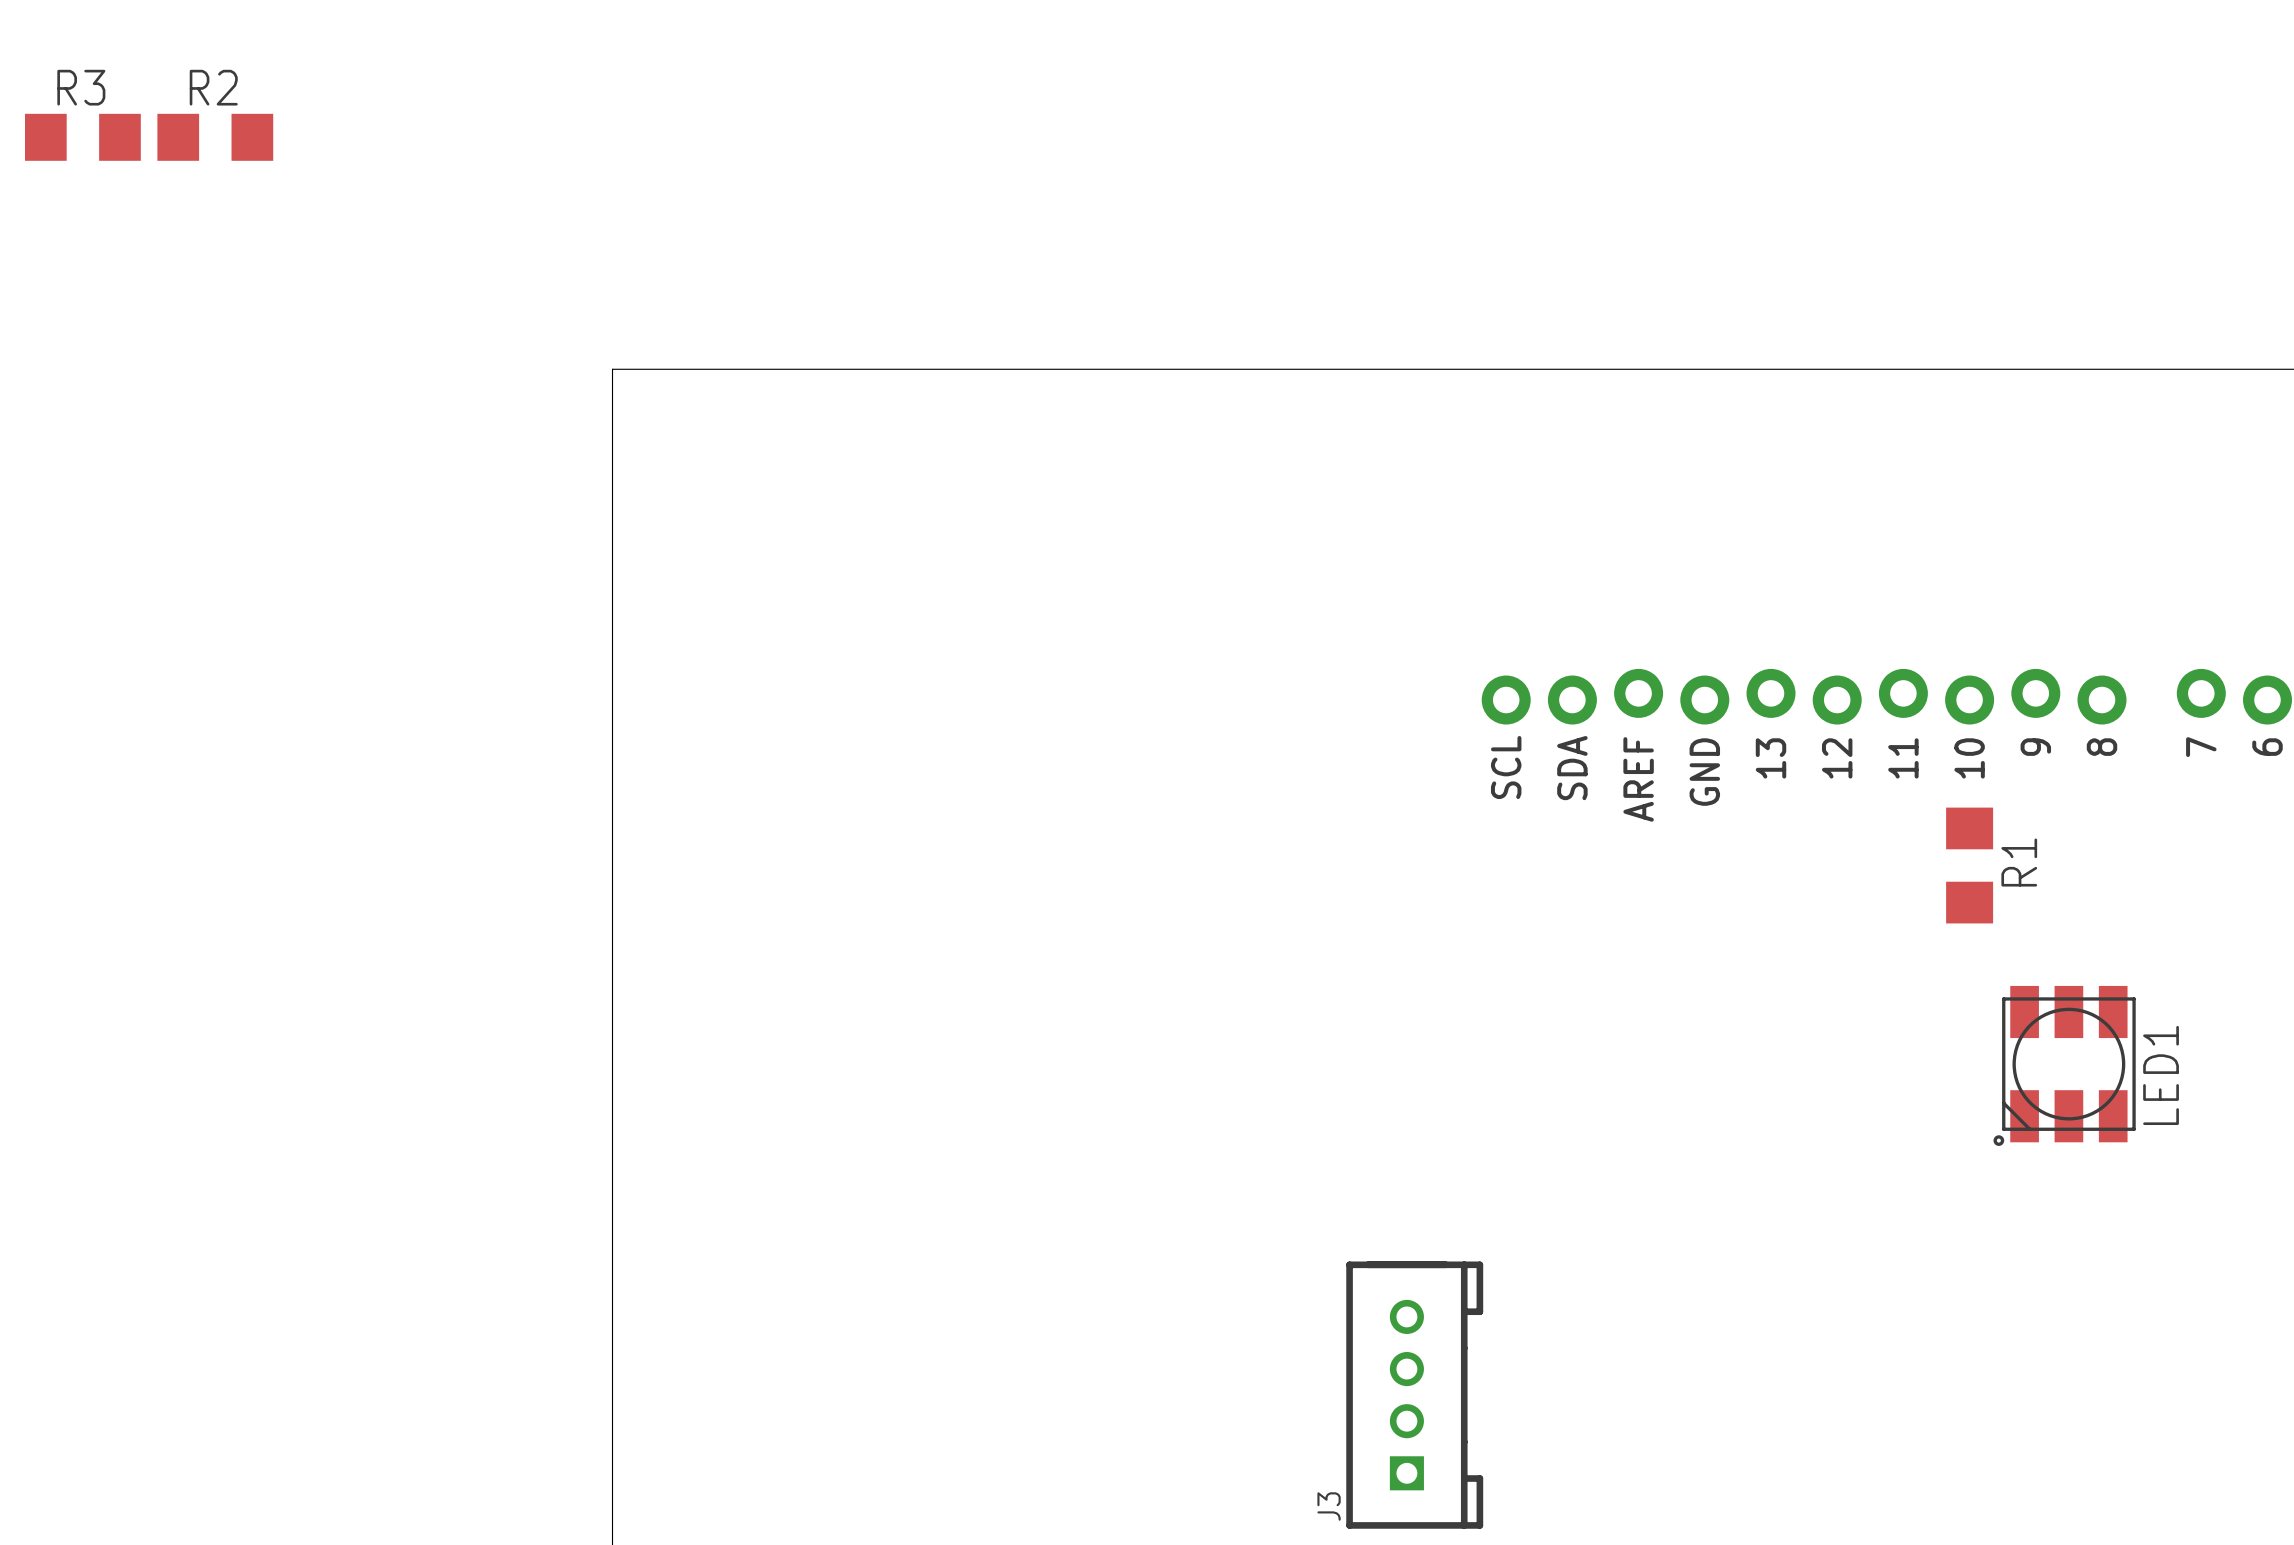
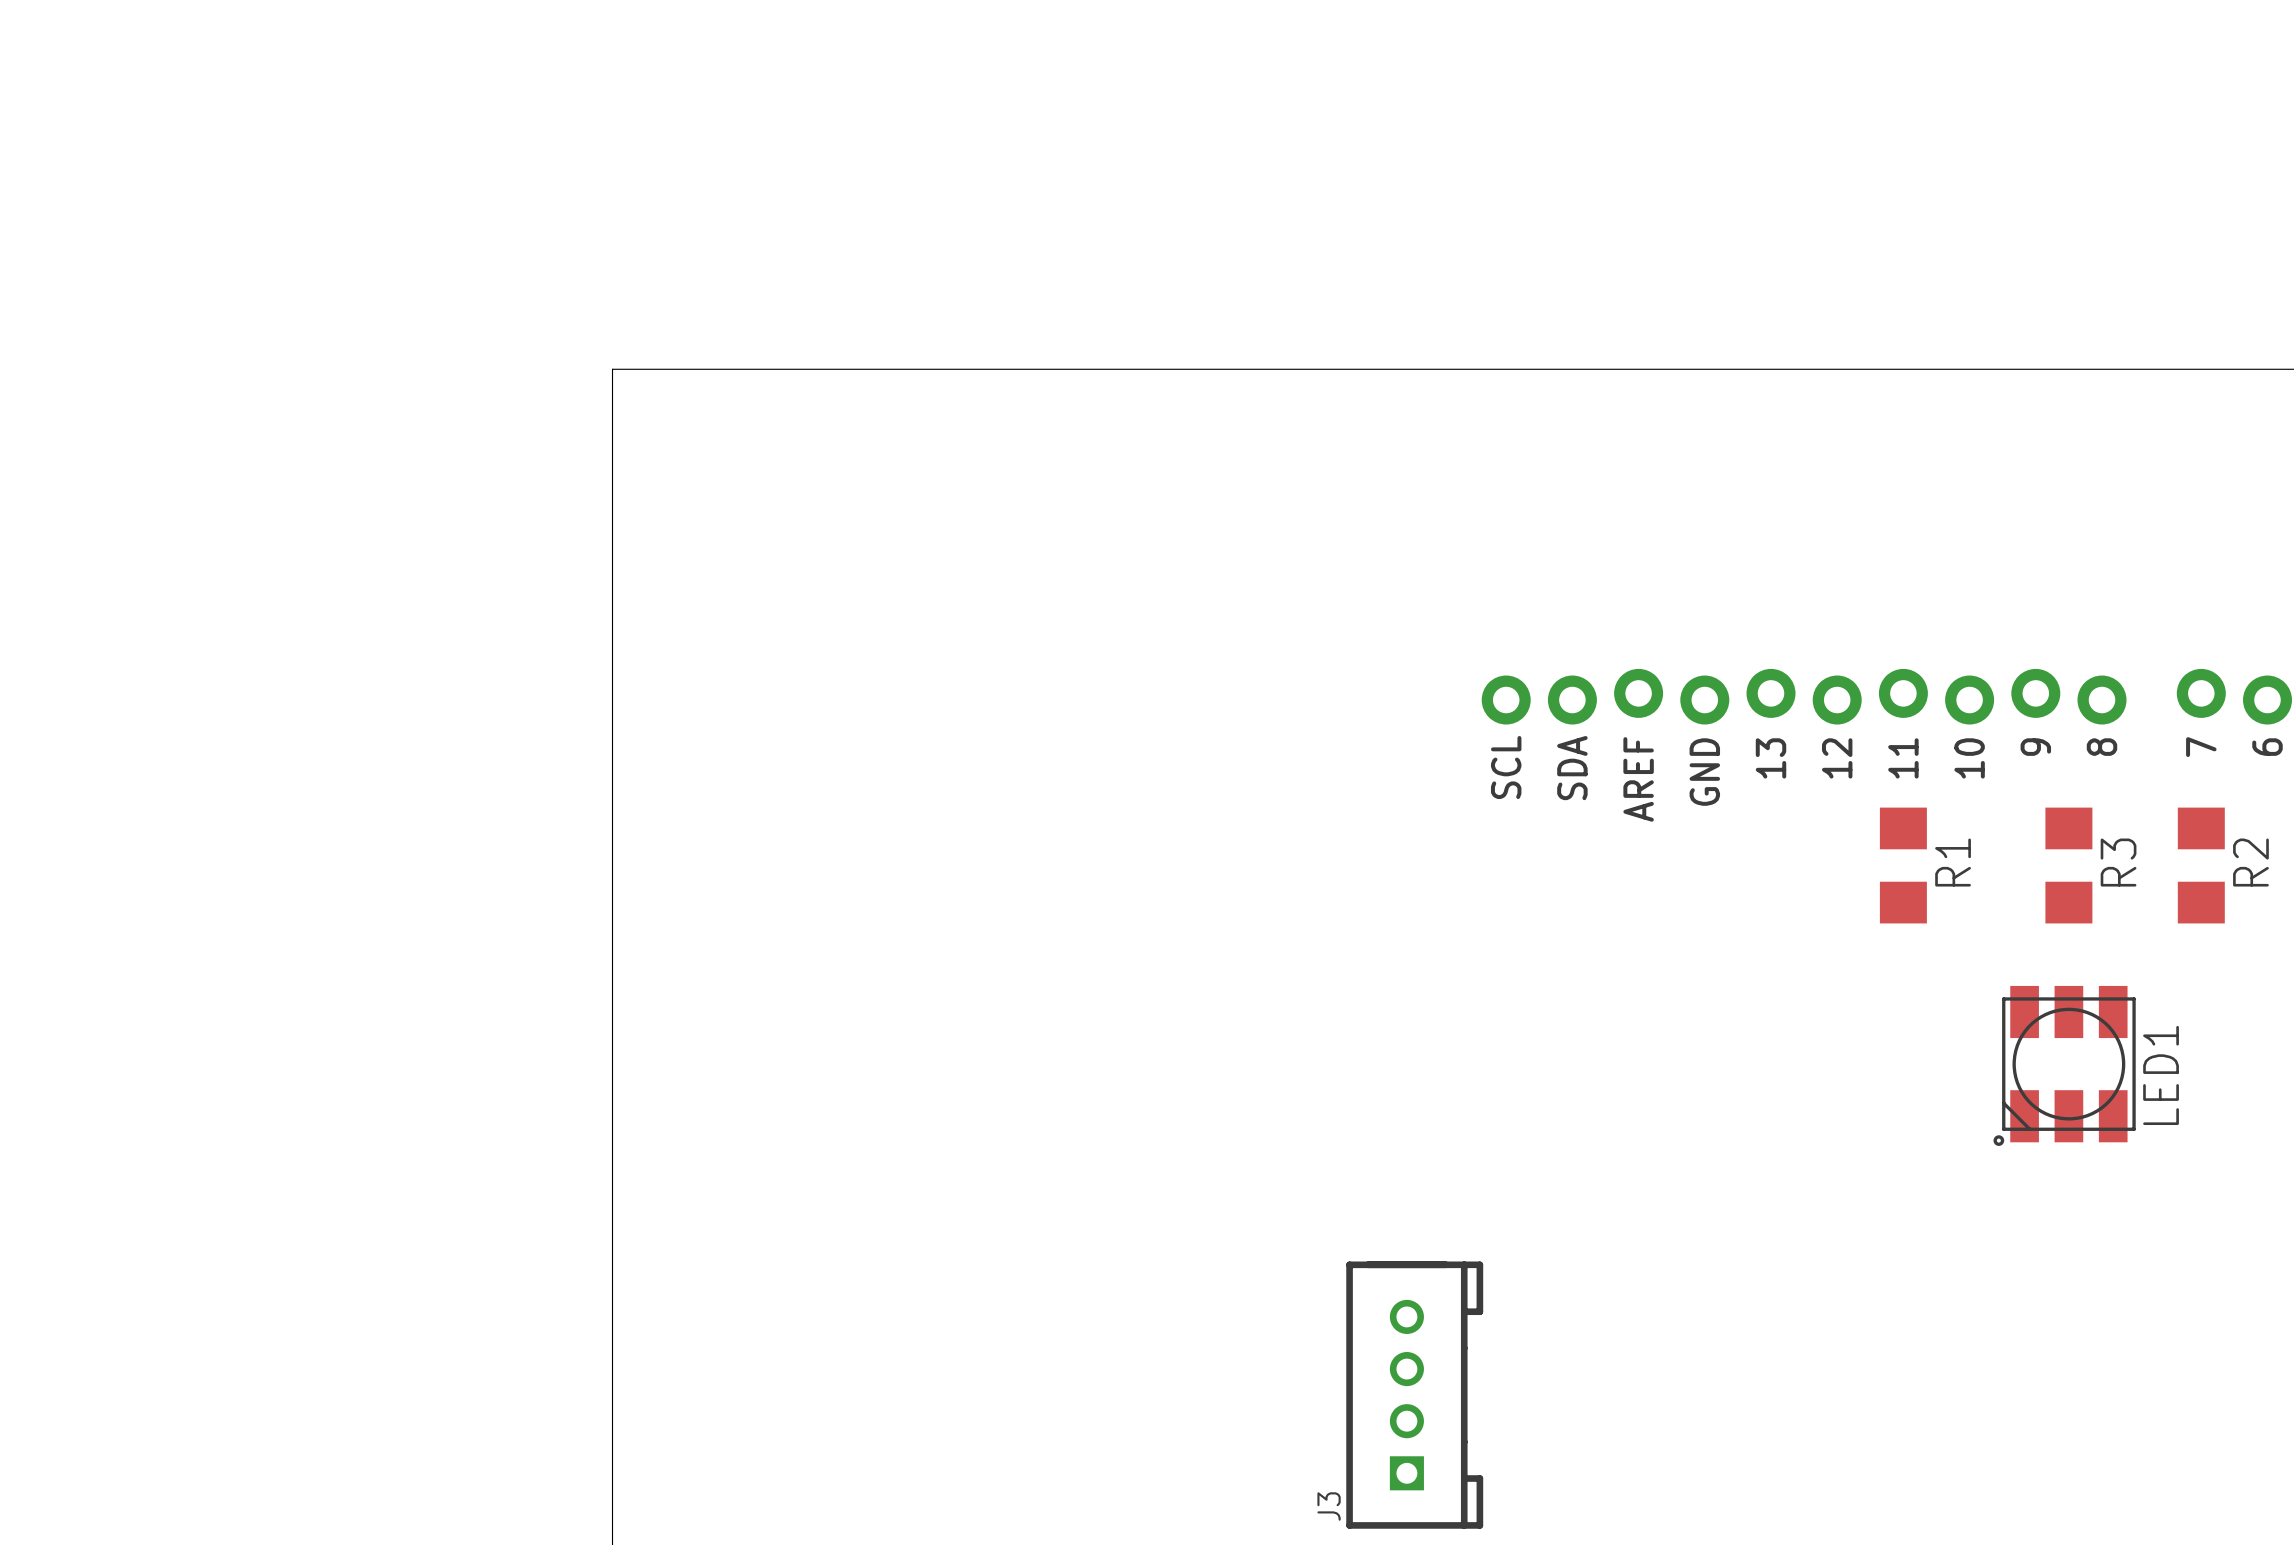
R3 rotation: 0° (82, 137) -> 90° clockwise (2068, 865)
R3 position: (82, 137) -> (2068, 865)
R2 rotation: 0° (215, 137) -> 90° clockwise (2201, 865)
R2 position: (215, 137) -> (2201, 865)
R1 position: (1969, 865) -> (1903, 865)

